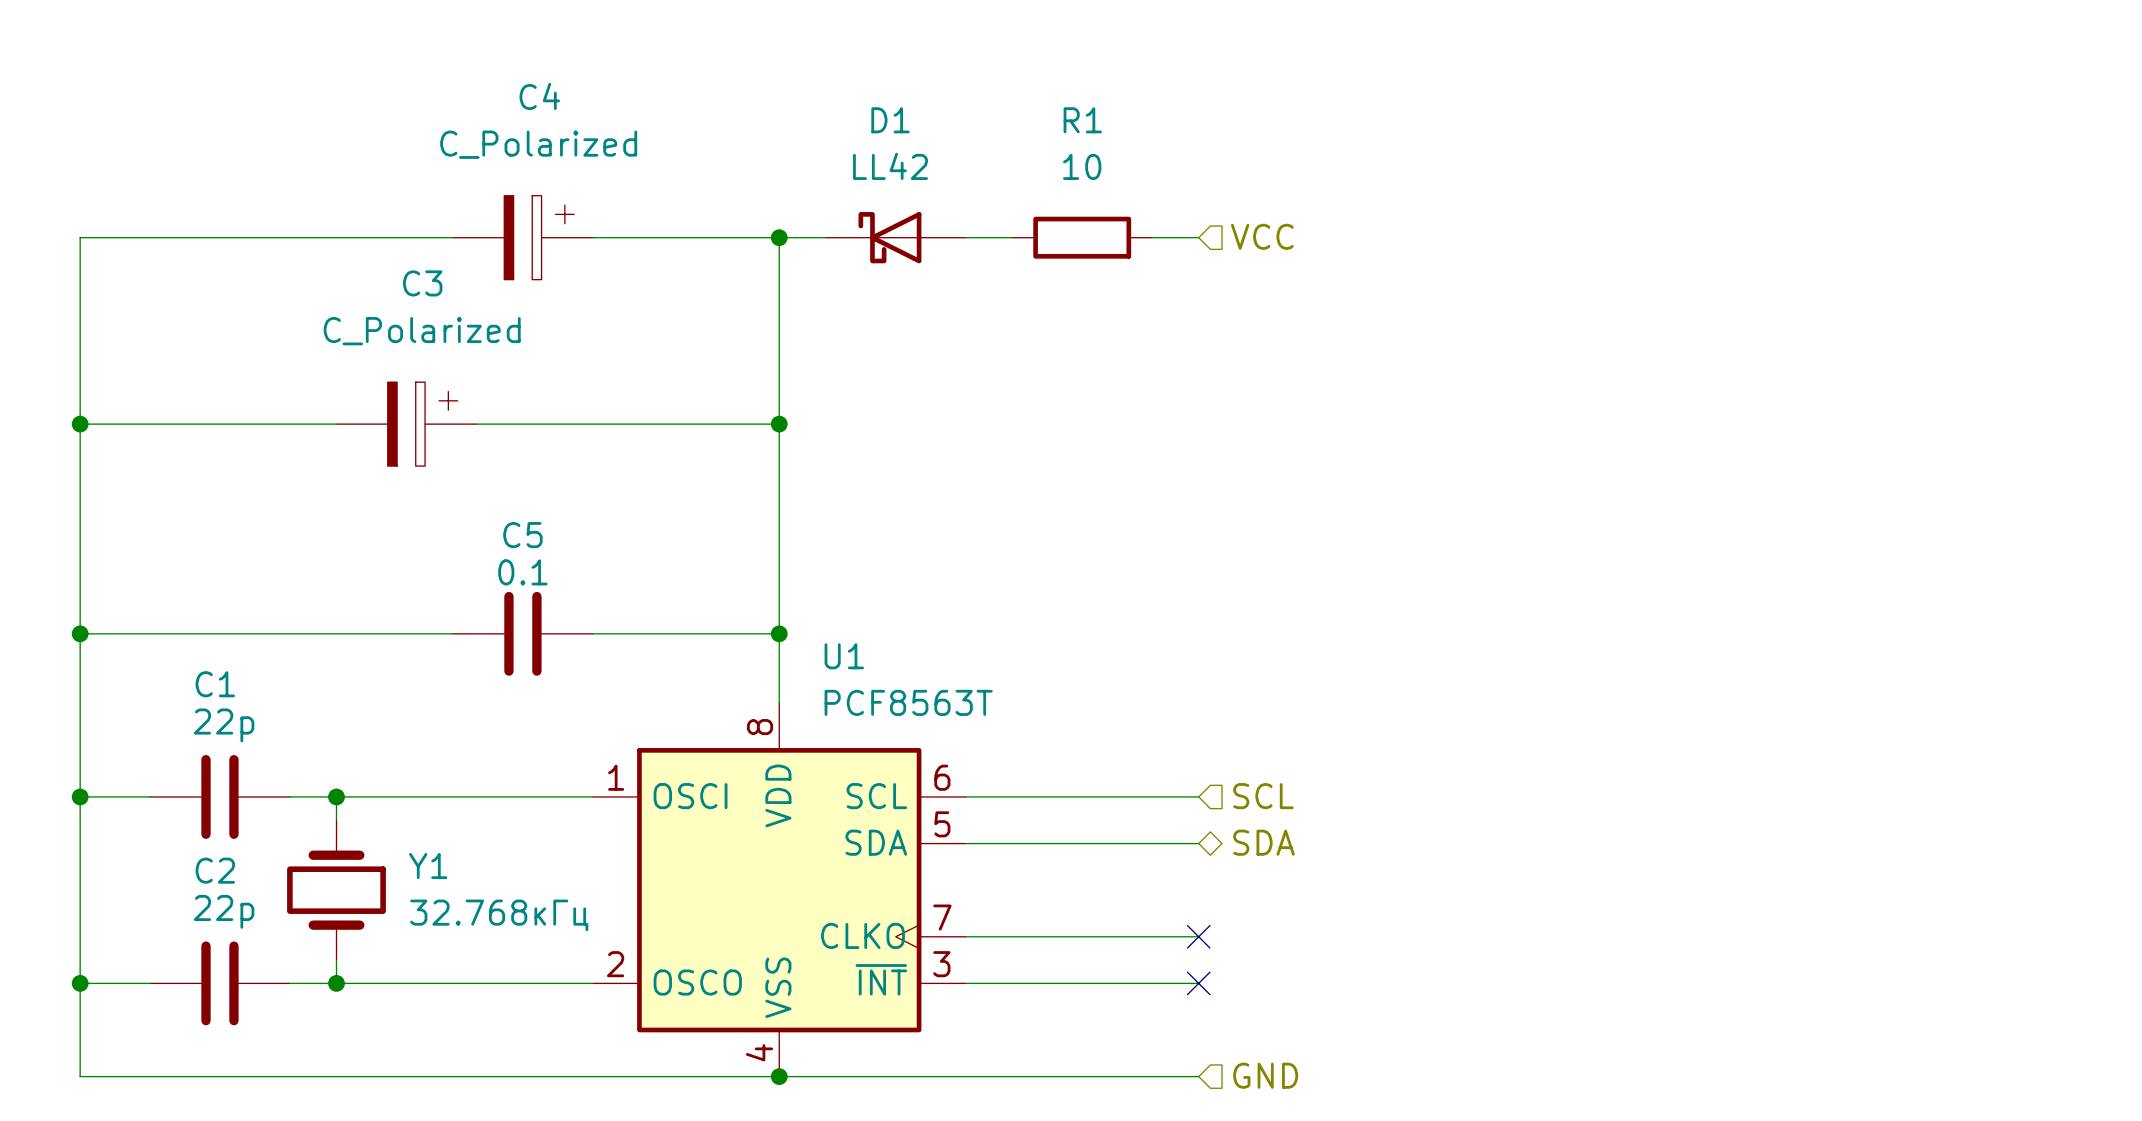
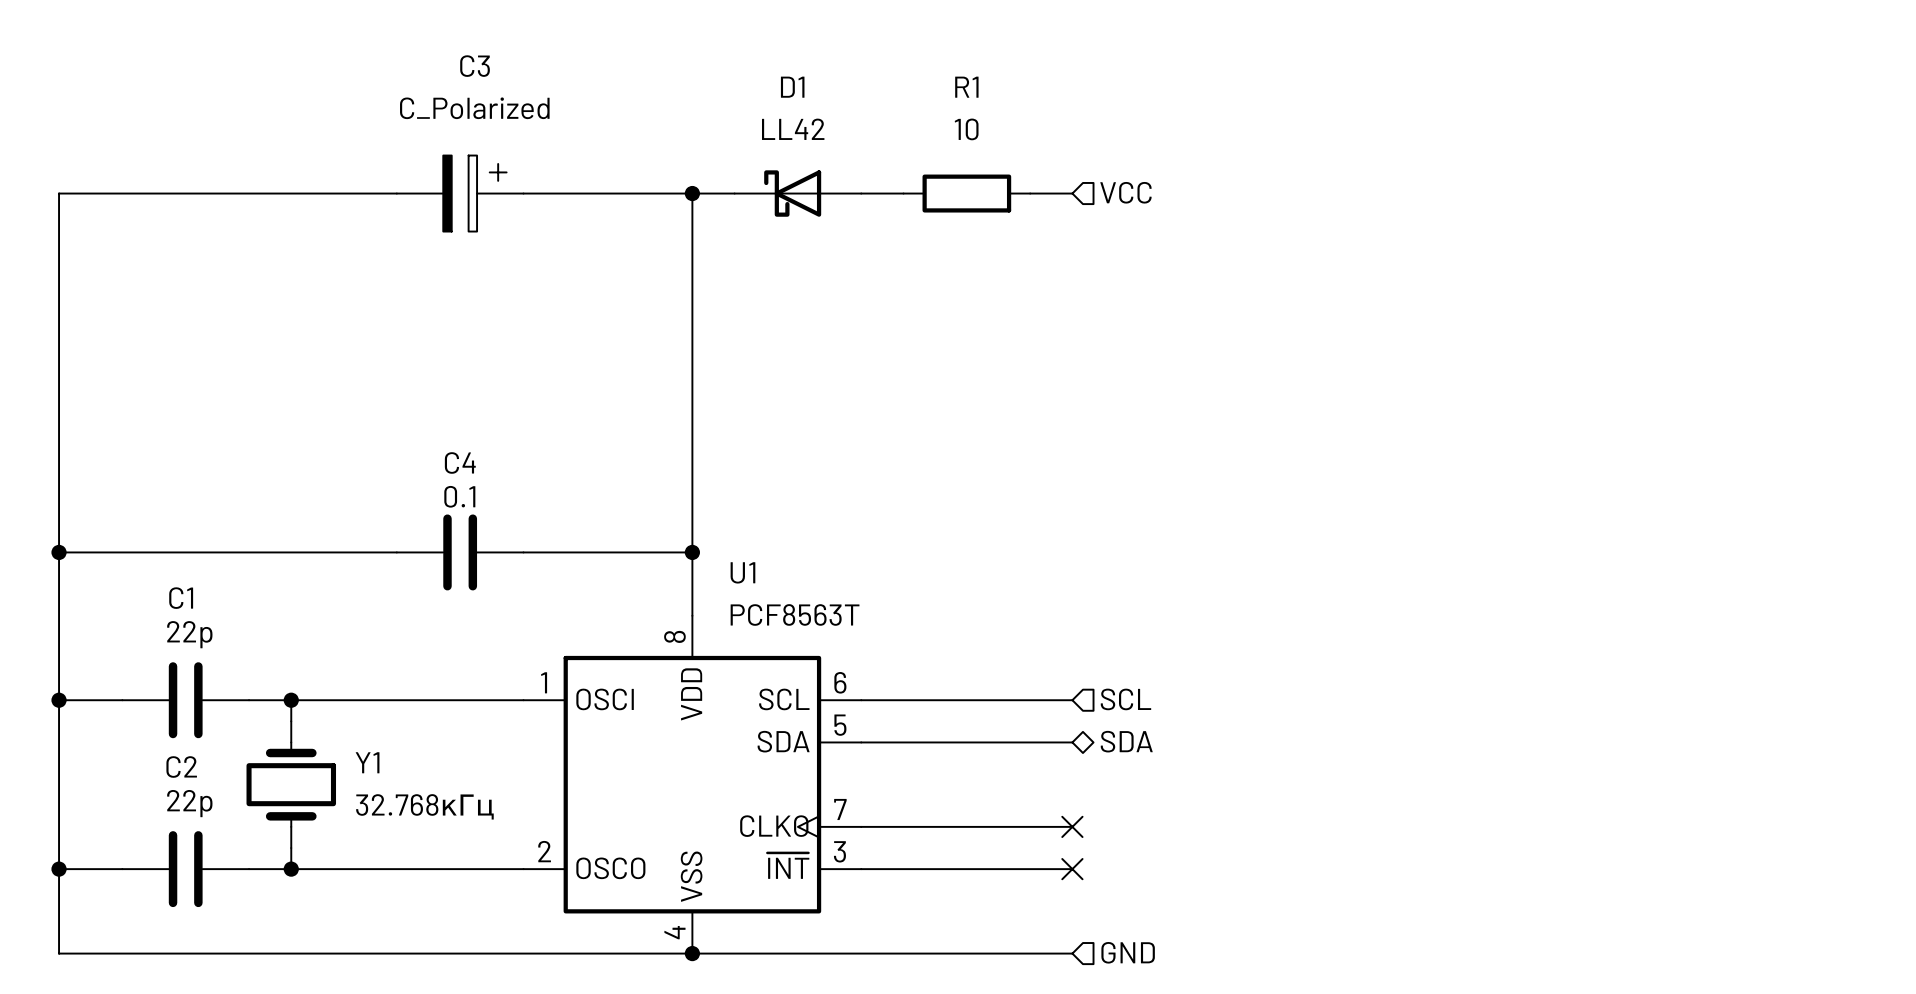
C4 name: C4 (539, 96) -> C3 (475, 66)
wire: (80, 424) (336, 424) -> none
junction: (80, 424) -> none
C3: C_Polarized (406, 424) -> none
wire: (476, 424) (779, 424) -> none
junction: (779, 424) -> none
C5 name: C5 (522, 535) -> C4 (460, 463)

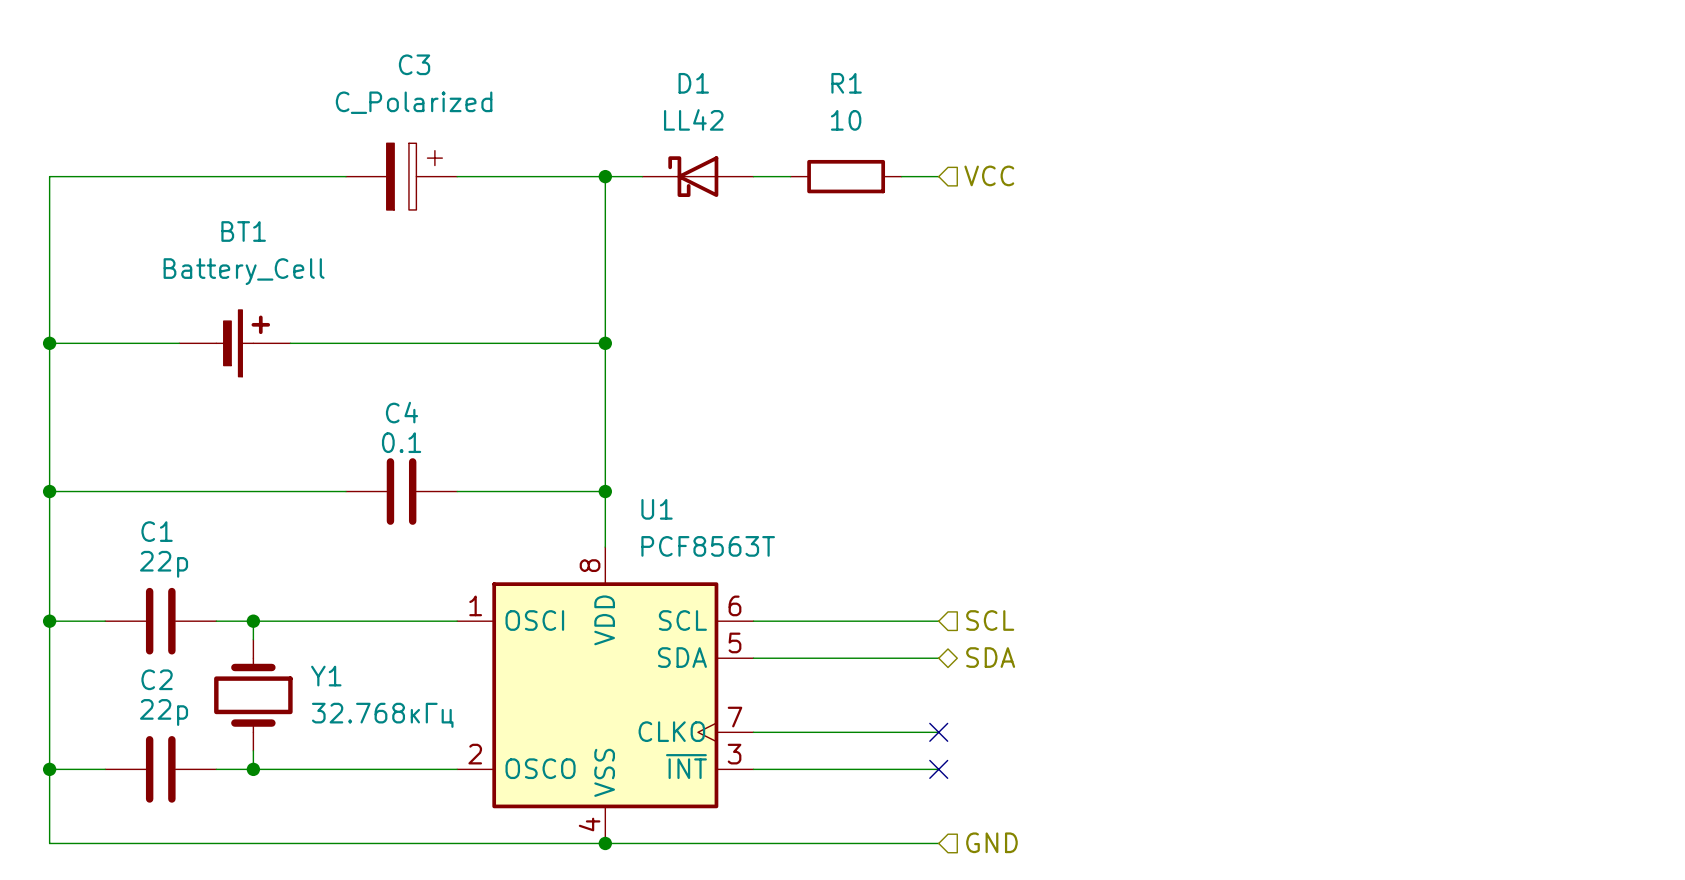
wire: none -> (49, 343) (179, 343)
junction: none -> (49, 343)
BT1: none -> Battery_Cell (234, 343)
wire: none -> (290, 343) (605, 343)
junction: none -> (605, 343)

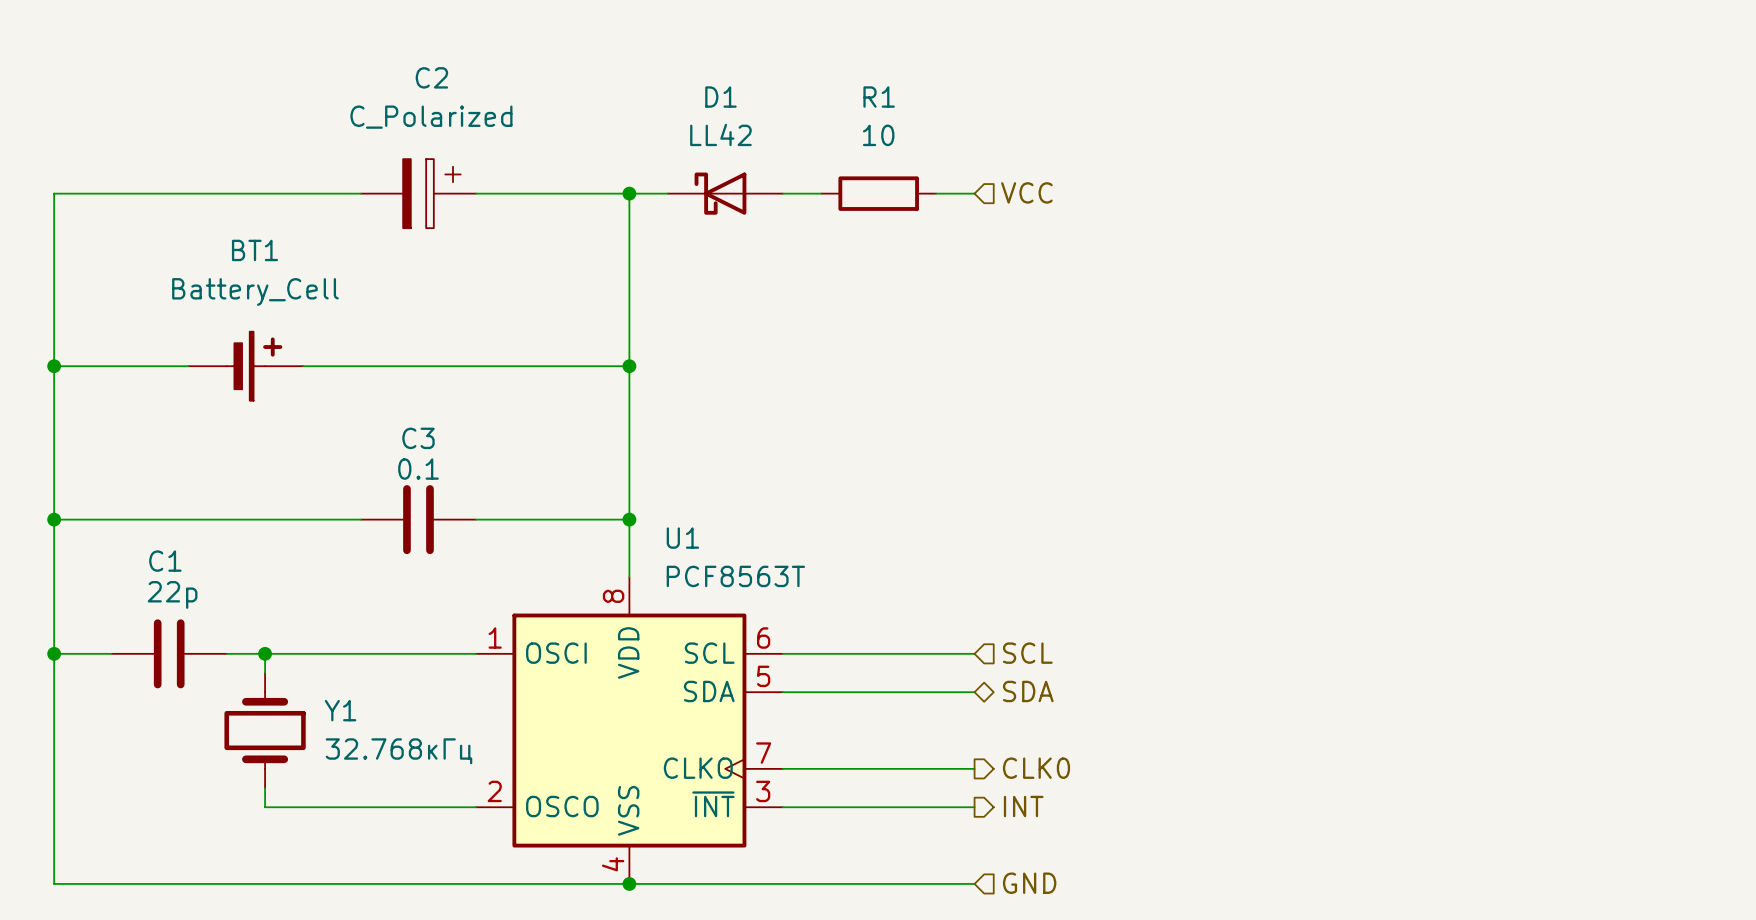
C3 name: C3 (414, 64) -> C2 (431, 77)
C4 name: C4 (402, 412) -> C3 (418, 438)
hierarchical label: none -> CLK0 (1036, 768)
no-connect mark: (938, 732) -> none
hierarchical label: none -> INT (1023, 806)
wire: (49, 769) (105, 769) -> none
junction: (49, 769) -> none
C2: 22p (160, 769) -> none
wire: (216, 769) (253, 769) -> none
junction: (253, 769) -> none
no-connect mark: (938, 769) -> none

